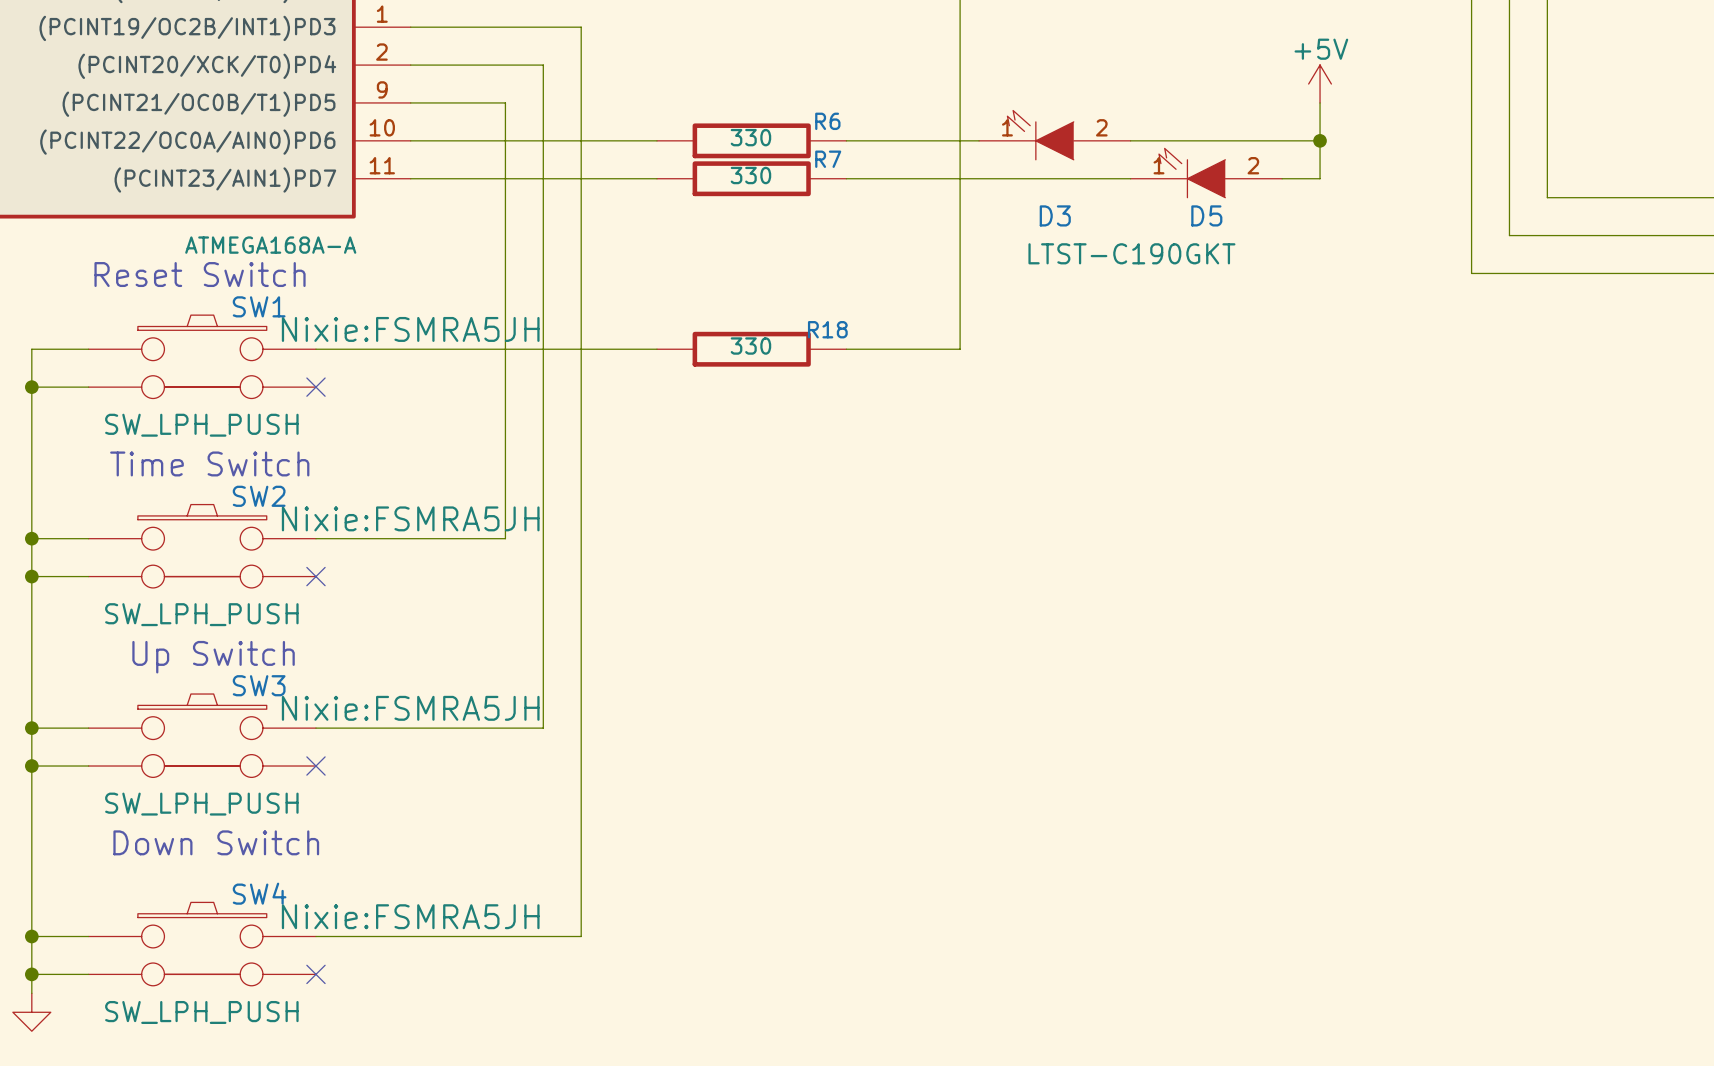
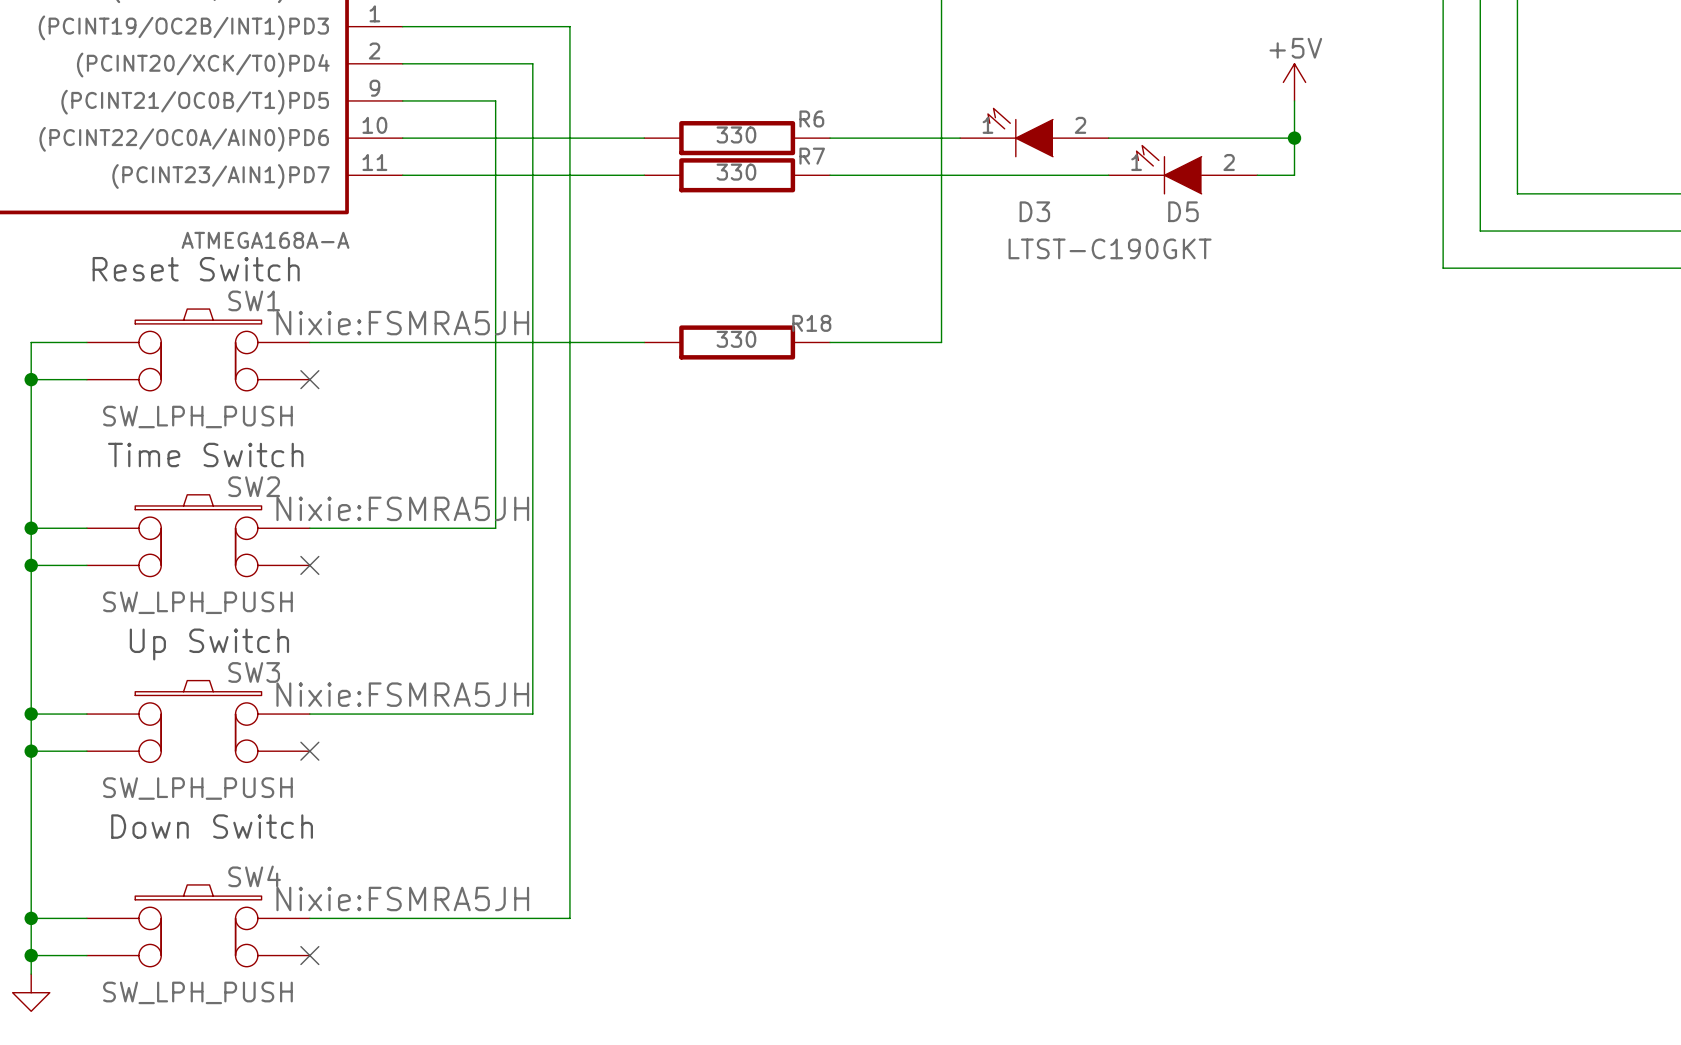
SW1 symbol: [88, 315, 316, 399] -> [86, 309, 310, 391]
SW2 symbol: [88, 504, 316, 588] -> [86, 494, 310, 577]
SW3 symbol: [88, 694, 316, 778] -> [86, 680, 310, 763]
SW4 symbol: [88, 902, 316, 986] -> [86, 884, 310, 967]

